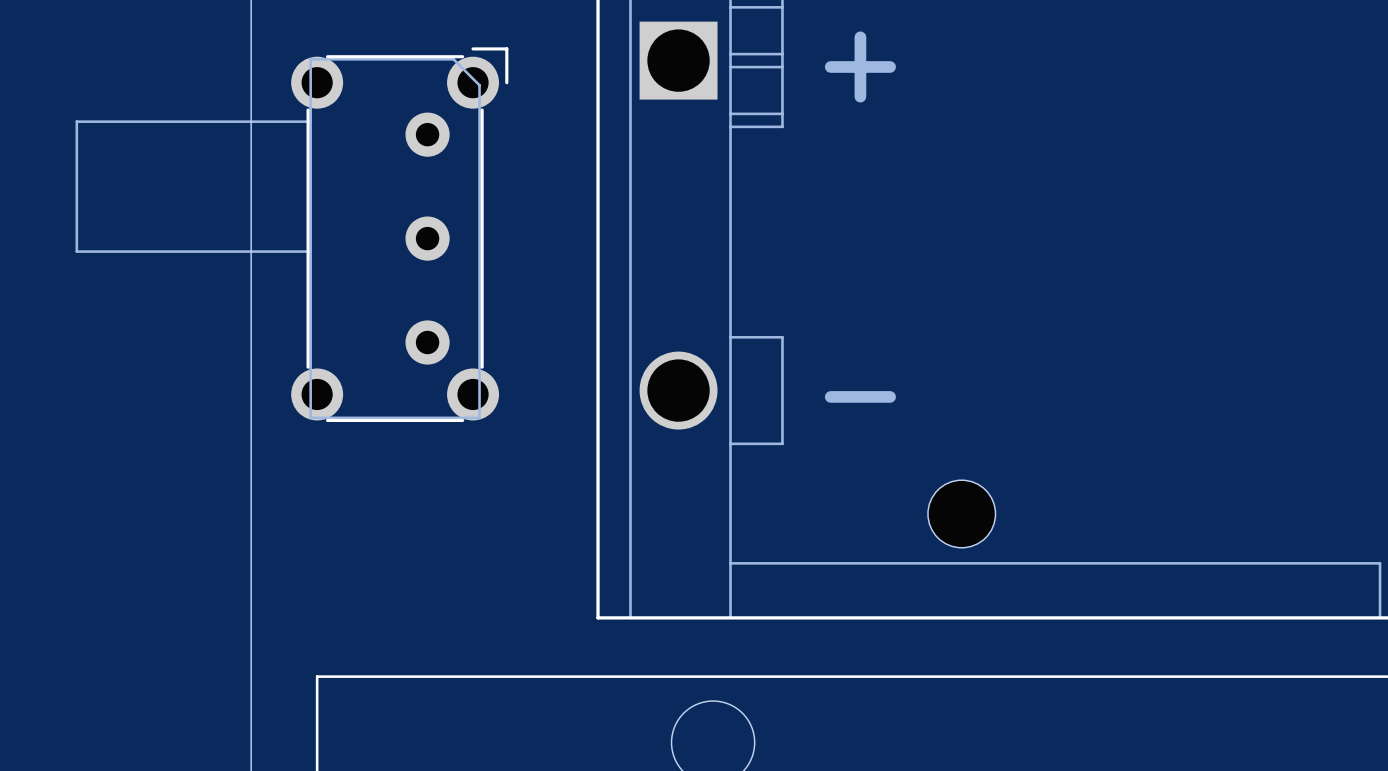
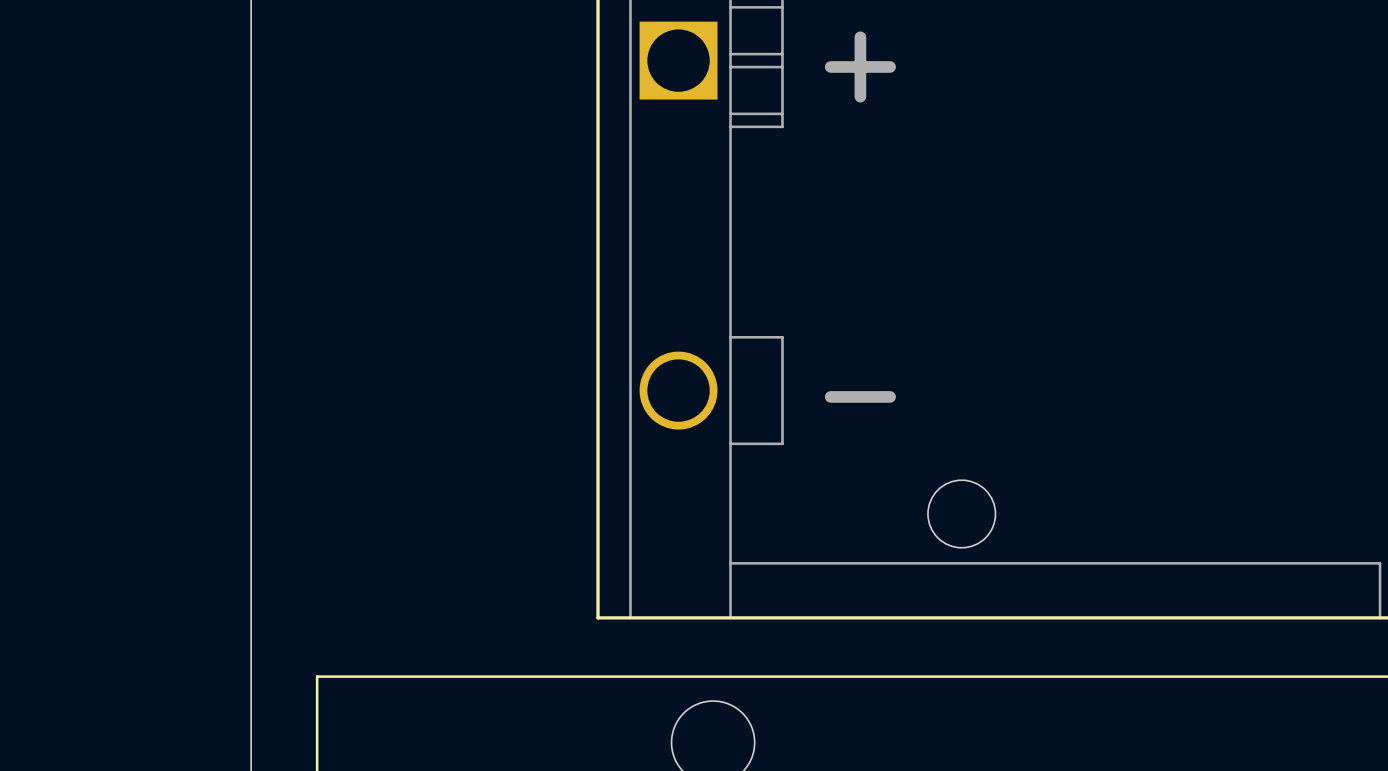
part: (291, 234) -> none

